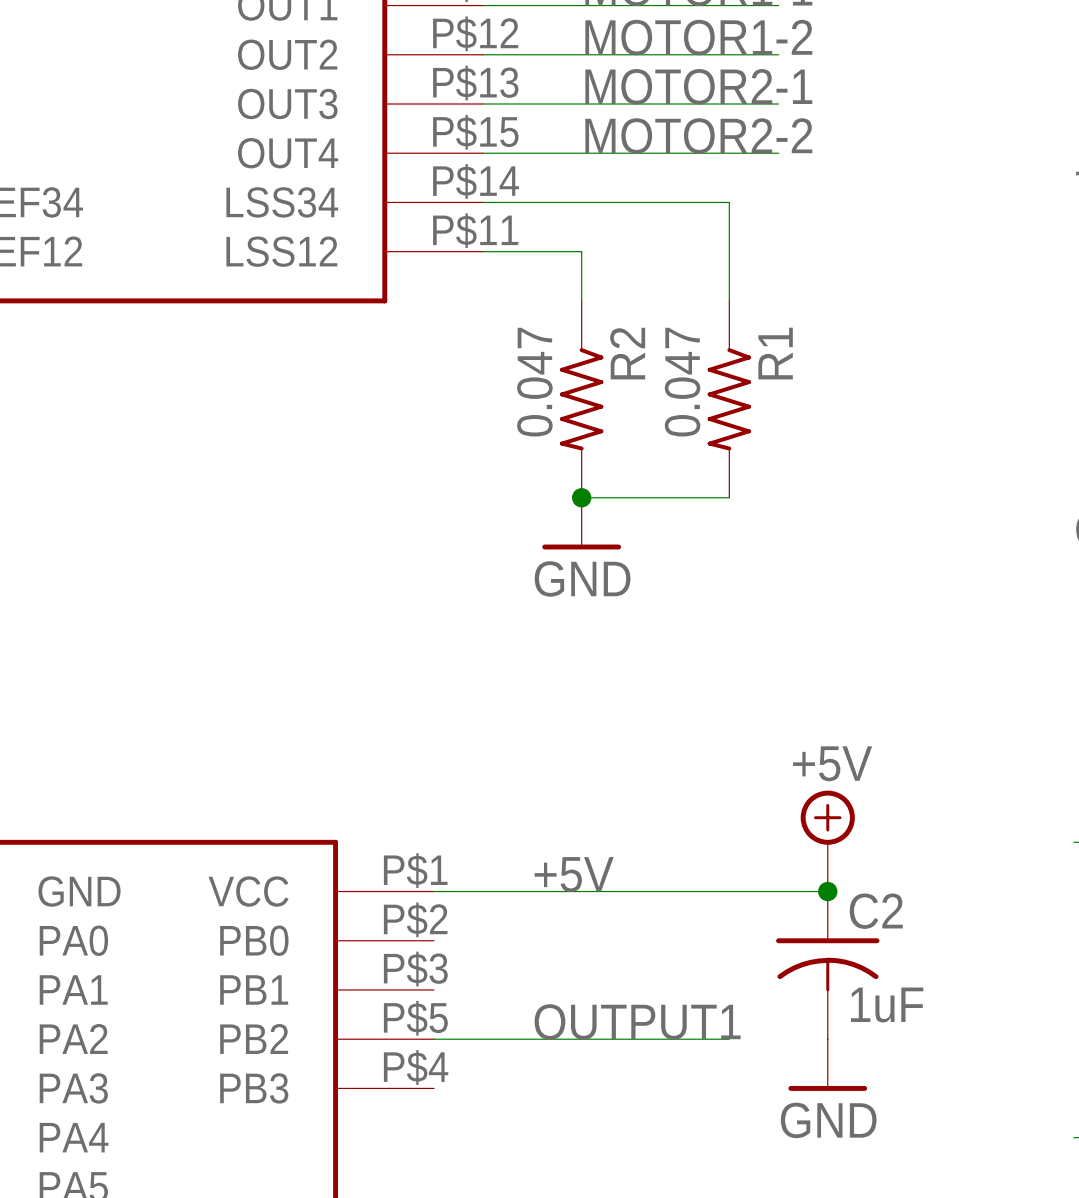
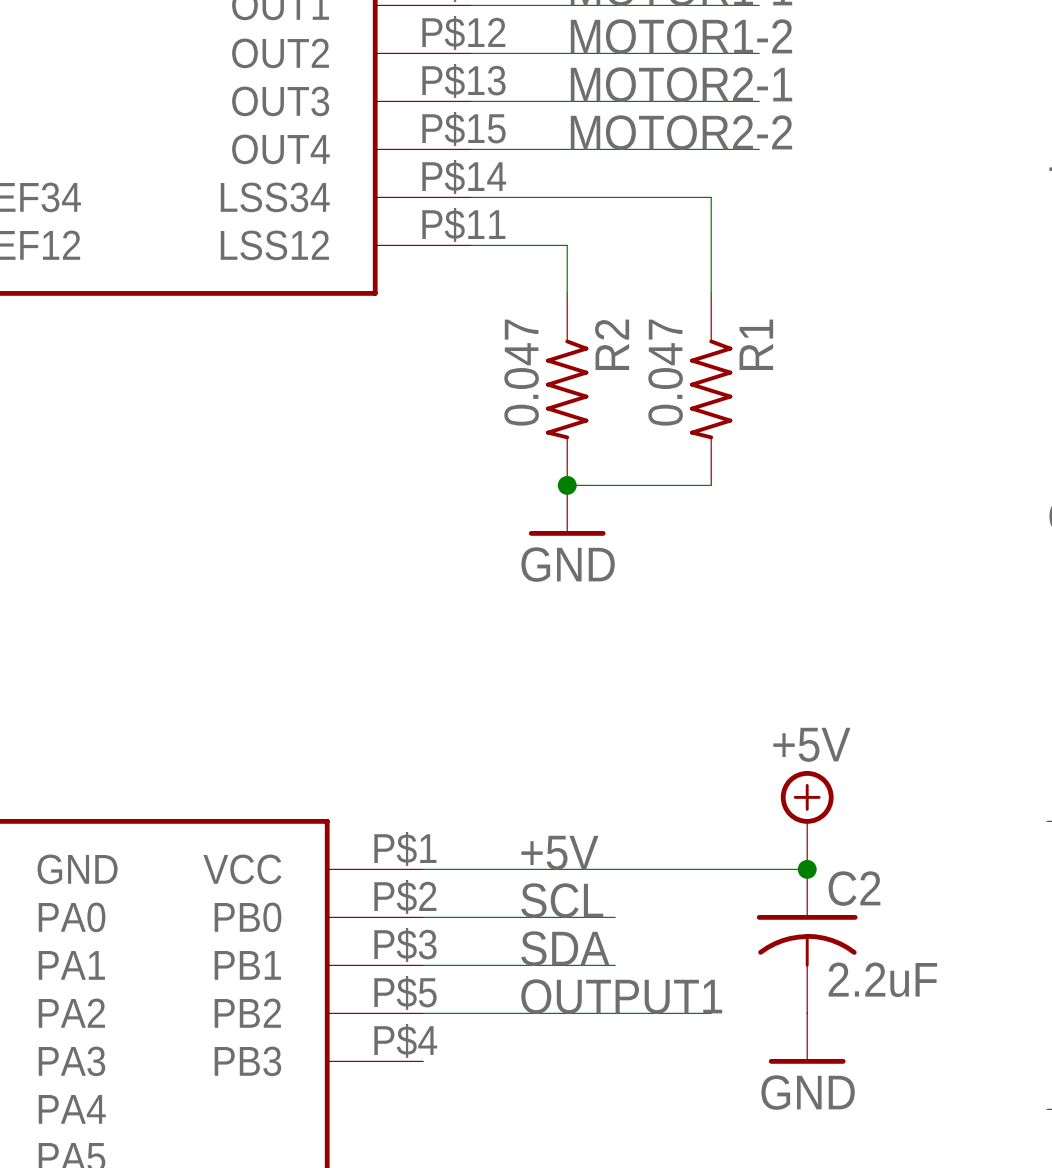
label: none -> SCL (562, 900)
wire: none -> (423, 917) (615, 917)
label: none -> SDA (565, 948)
wire: none -> (423, 965) (615, 965)
C2 value: 1uF (887, 1005) -> 2.2uF (882, 979)

